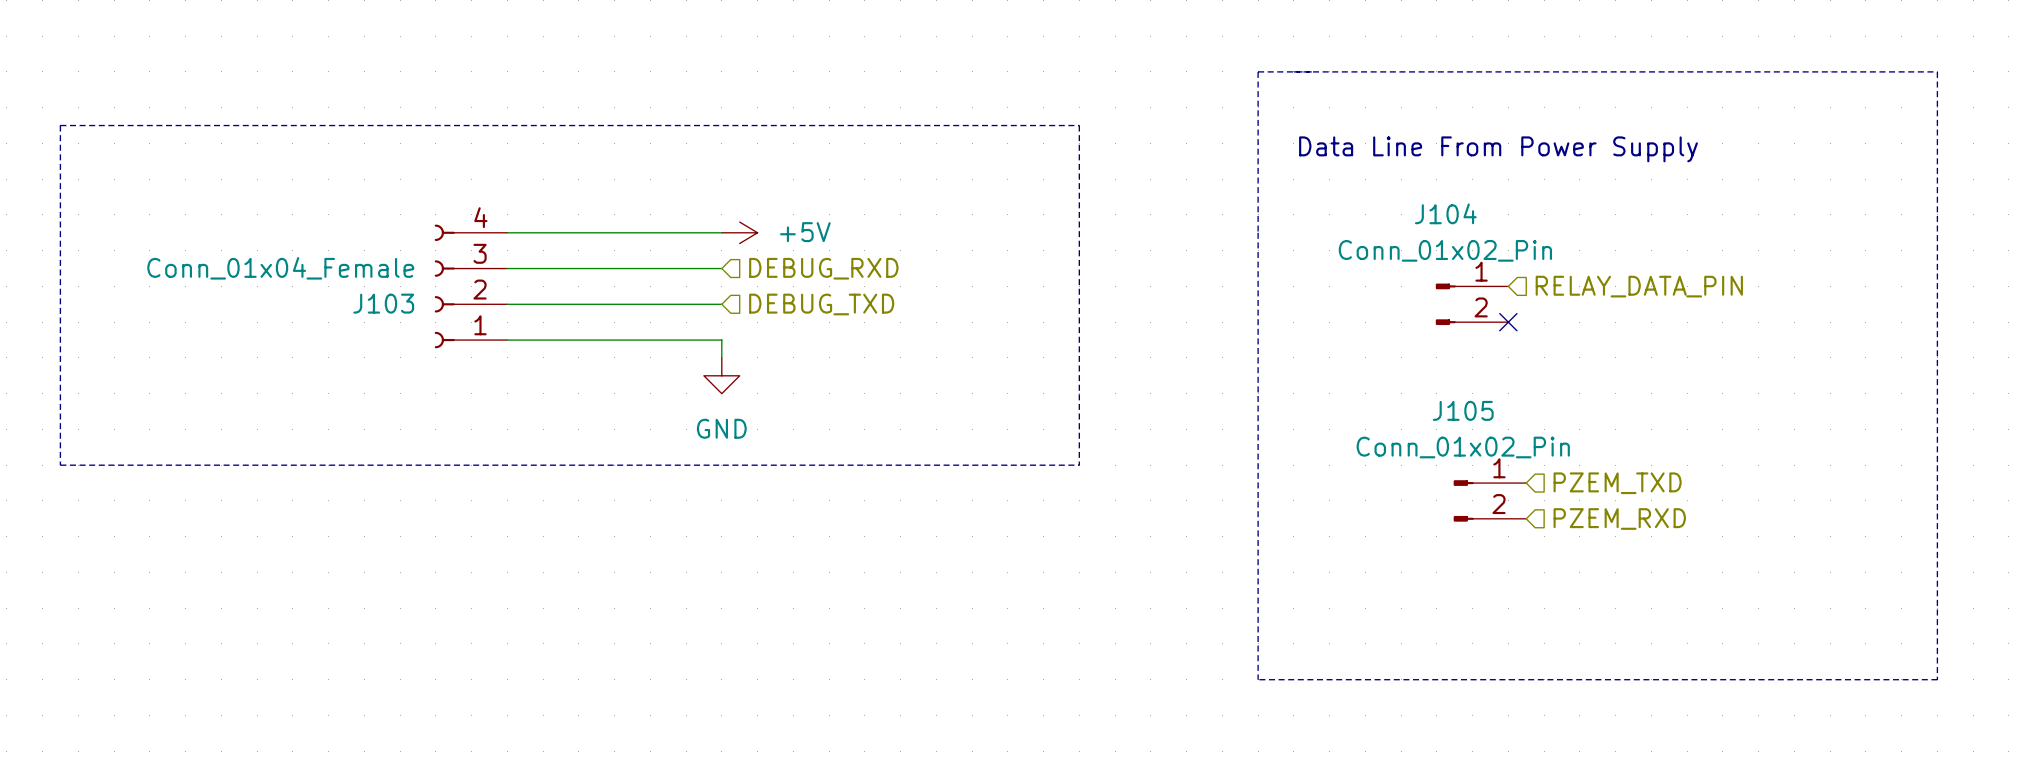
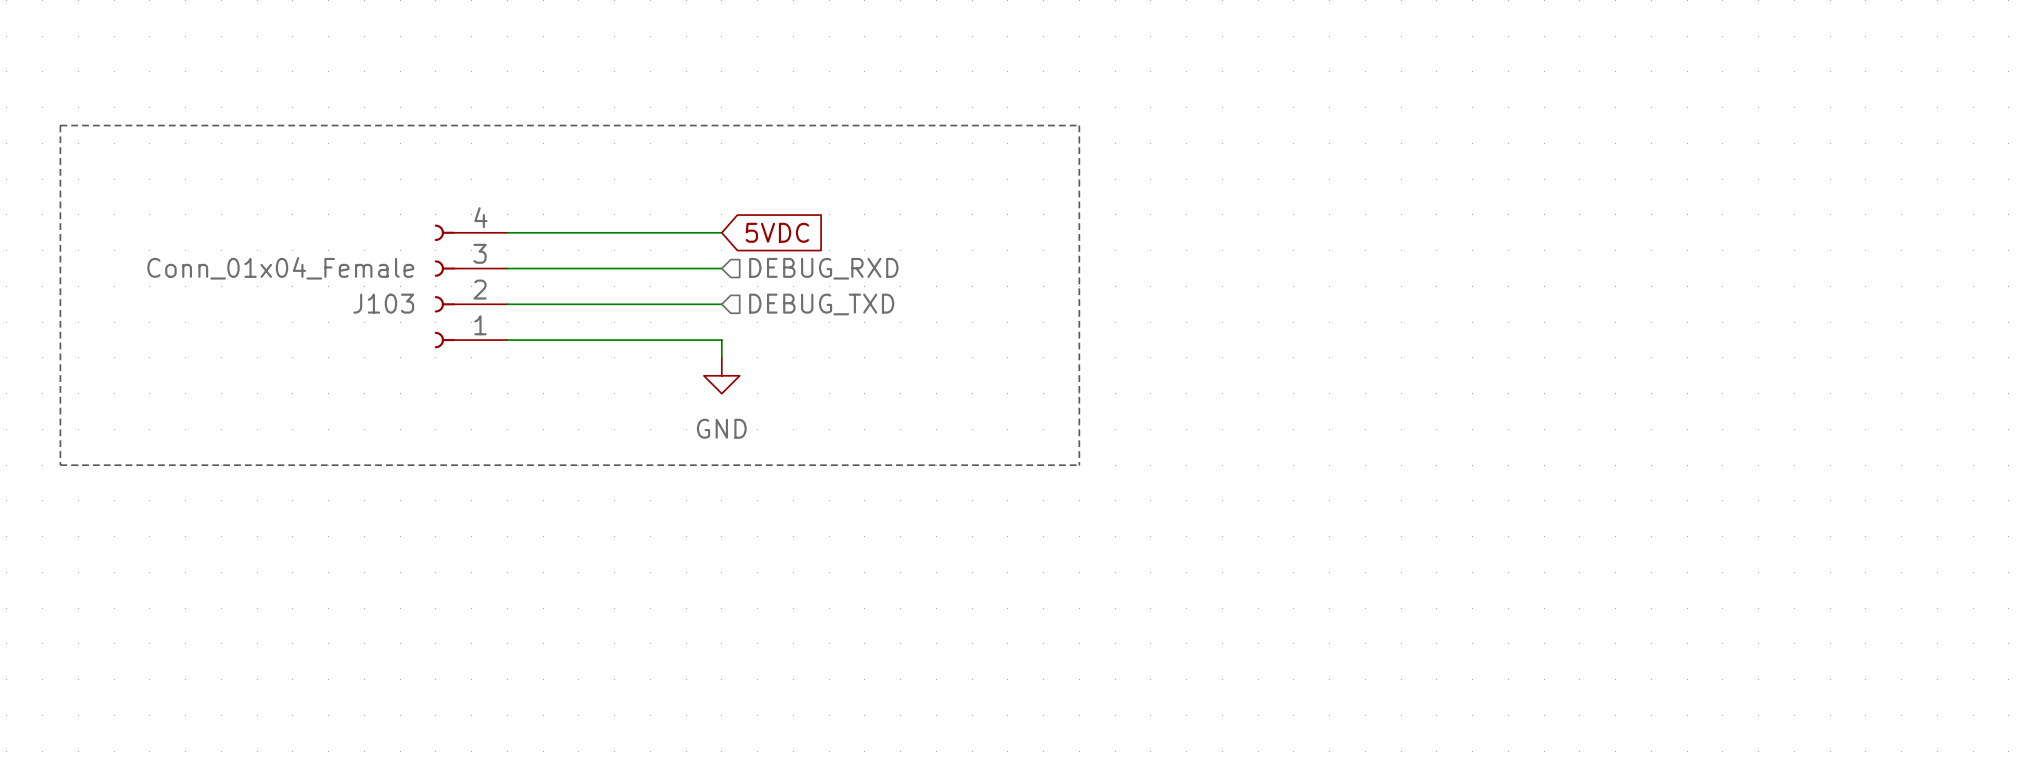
line: (1258, 71) (1258, 679) (1937, 679) (1937, 71) (1258, 71) -> none
text: Data Line From Power Supply (1498, 149) -> none
power symbol: +5V (739, 232) -> none
global label: none -> 5VDC (777, 232)
hierarchical label: RELAY_DATA_PIN (1639, 286) -> none
J104: Conn_01x02_Pin (1472, 304) -> none
no-connect mark: (1508, 322) -> none
hierarchical label: PZEM_TXD (1617, 483) -> none
J105: Conn_01x02_Pin (1489, 500) -> none
hierarchical label: PZEM_RXD (1619, 518) -> none

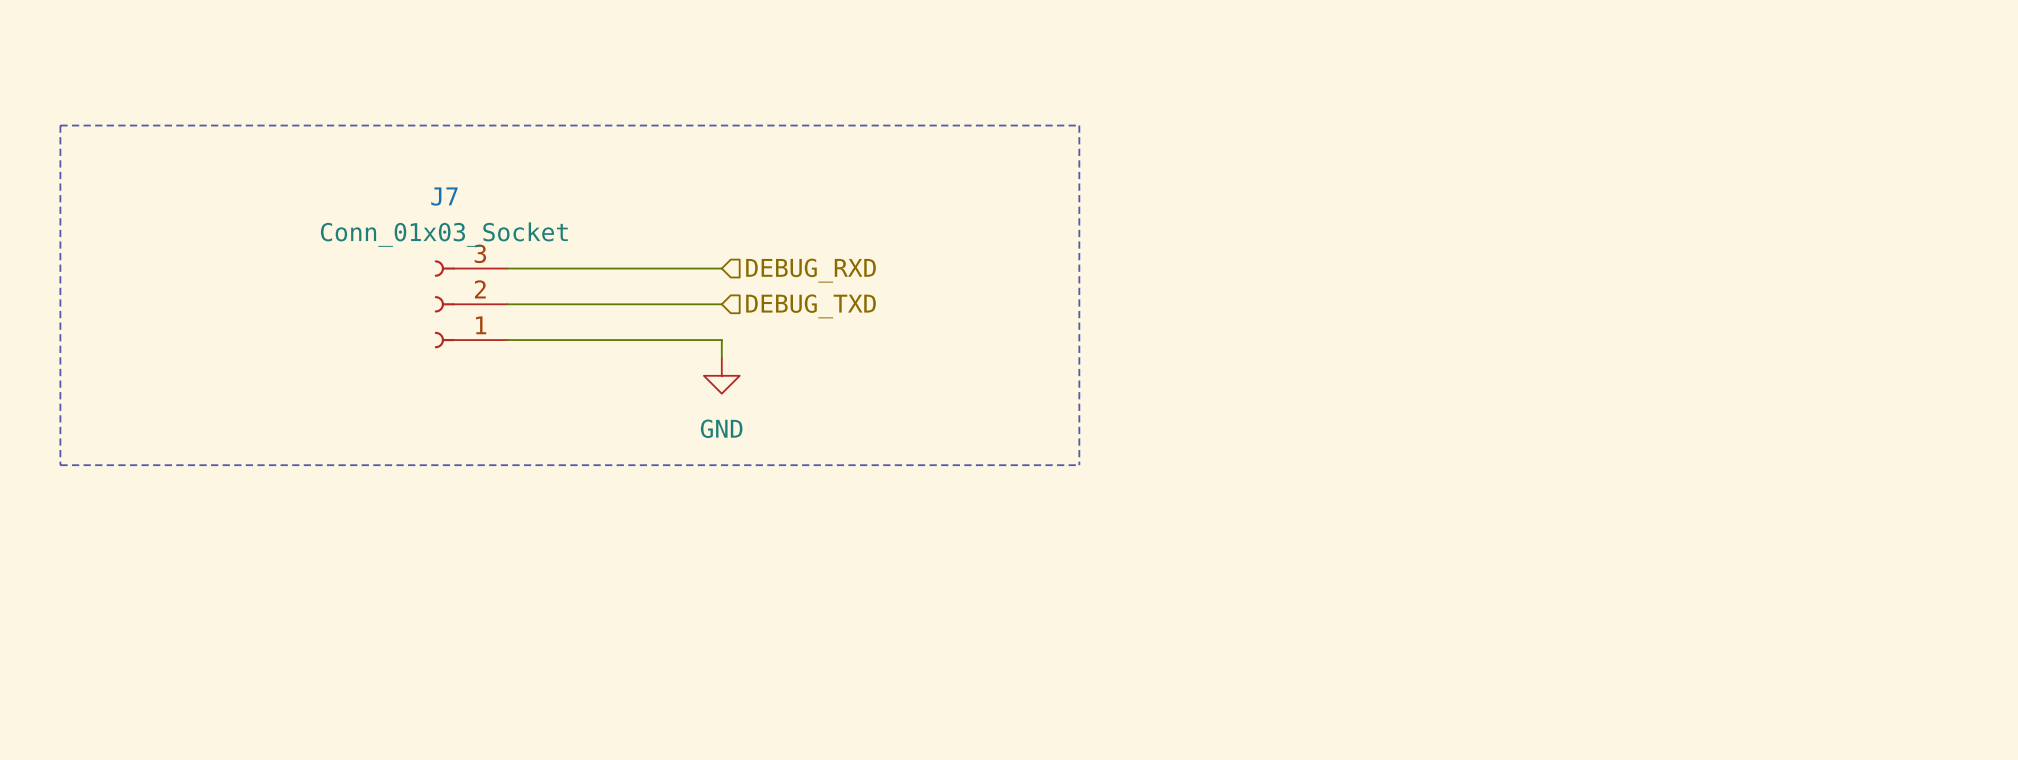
wire: (507, 232) (721, 232) -> none
global label: 5VDC (777, 232) -> none
J103: Conn_01x04_Female (471, 286) -> none
J7: none -> Conn_01x03_Socket (471, 304)

